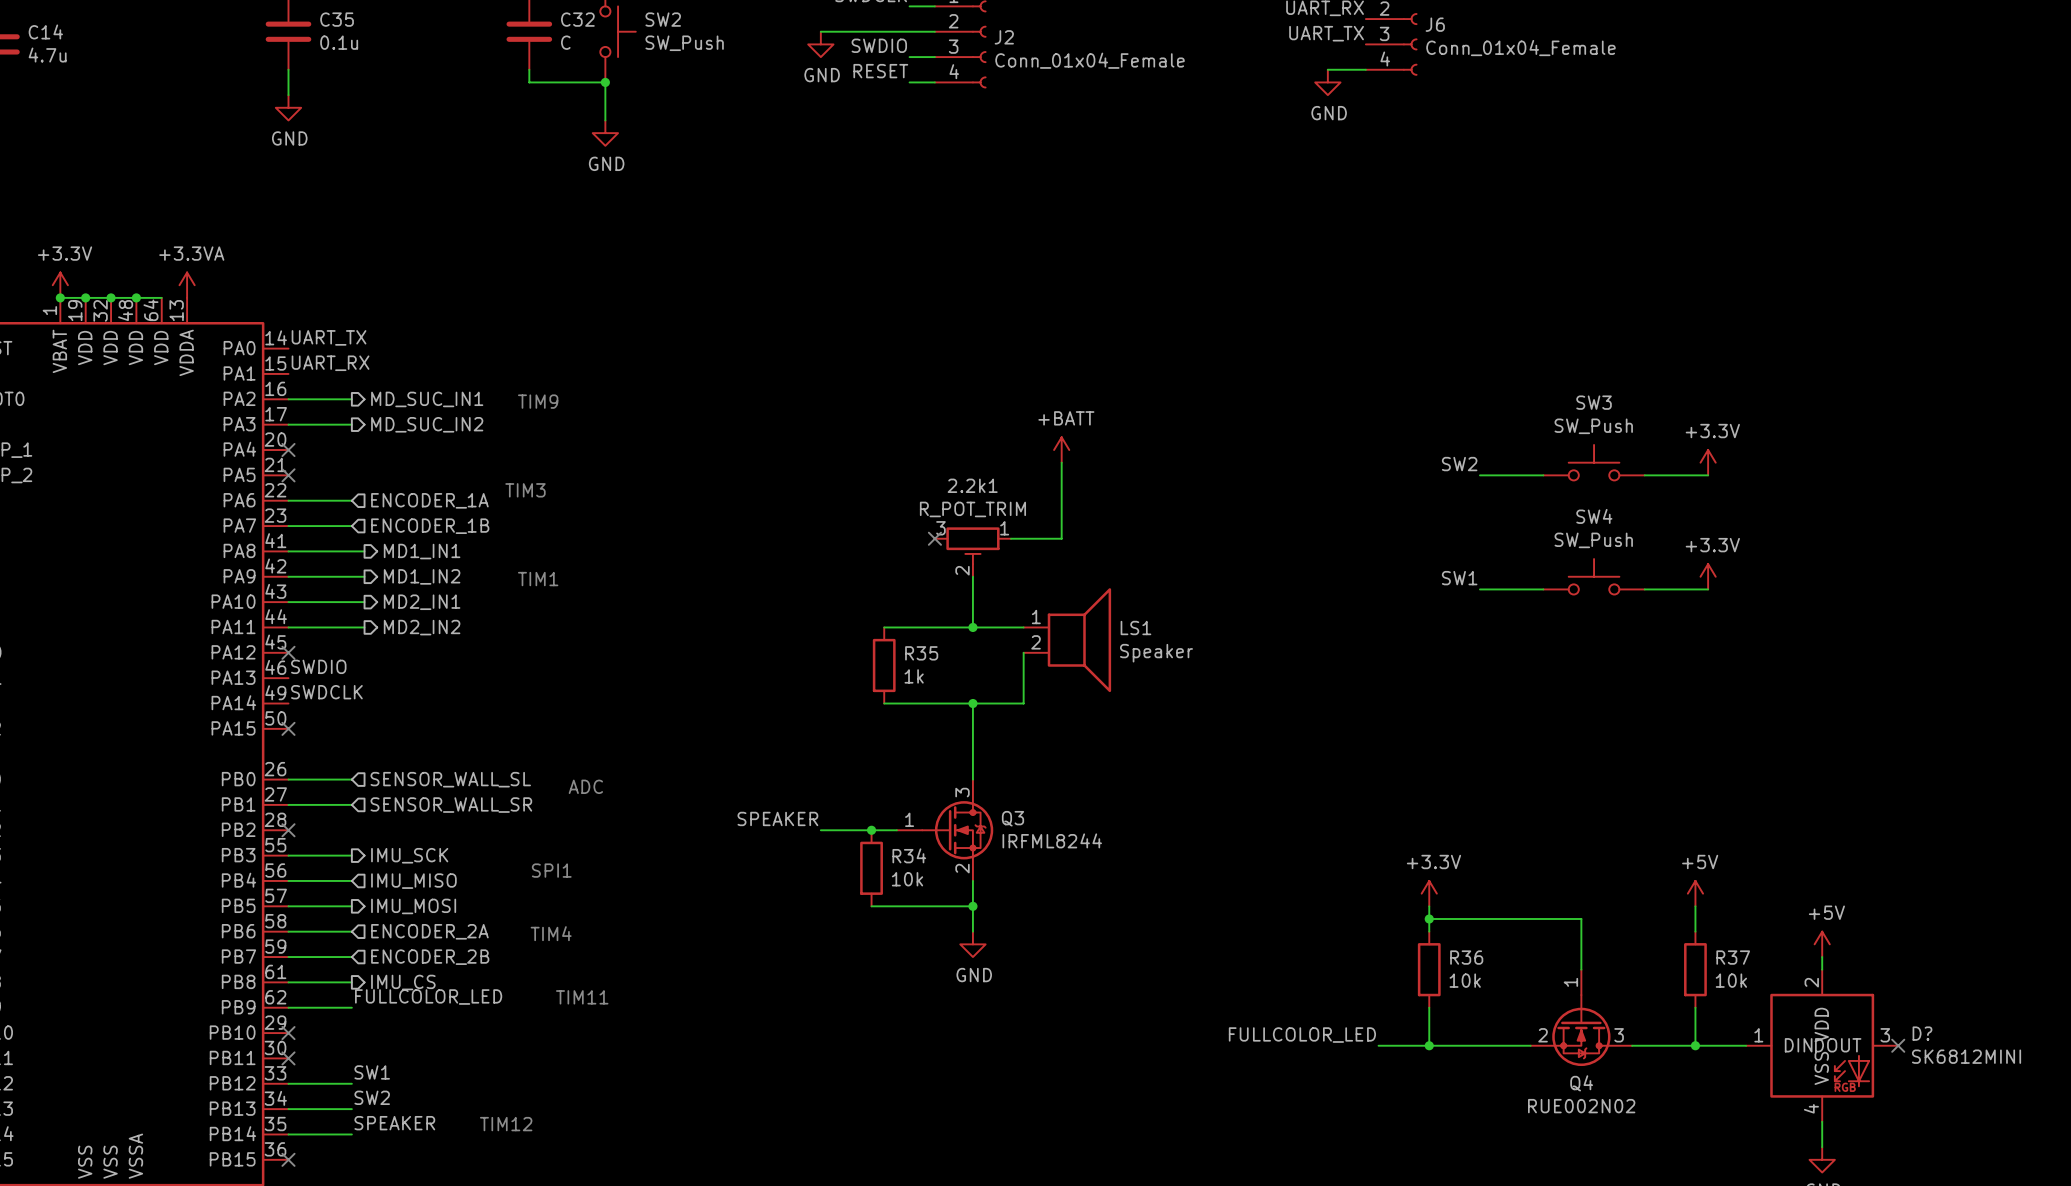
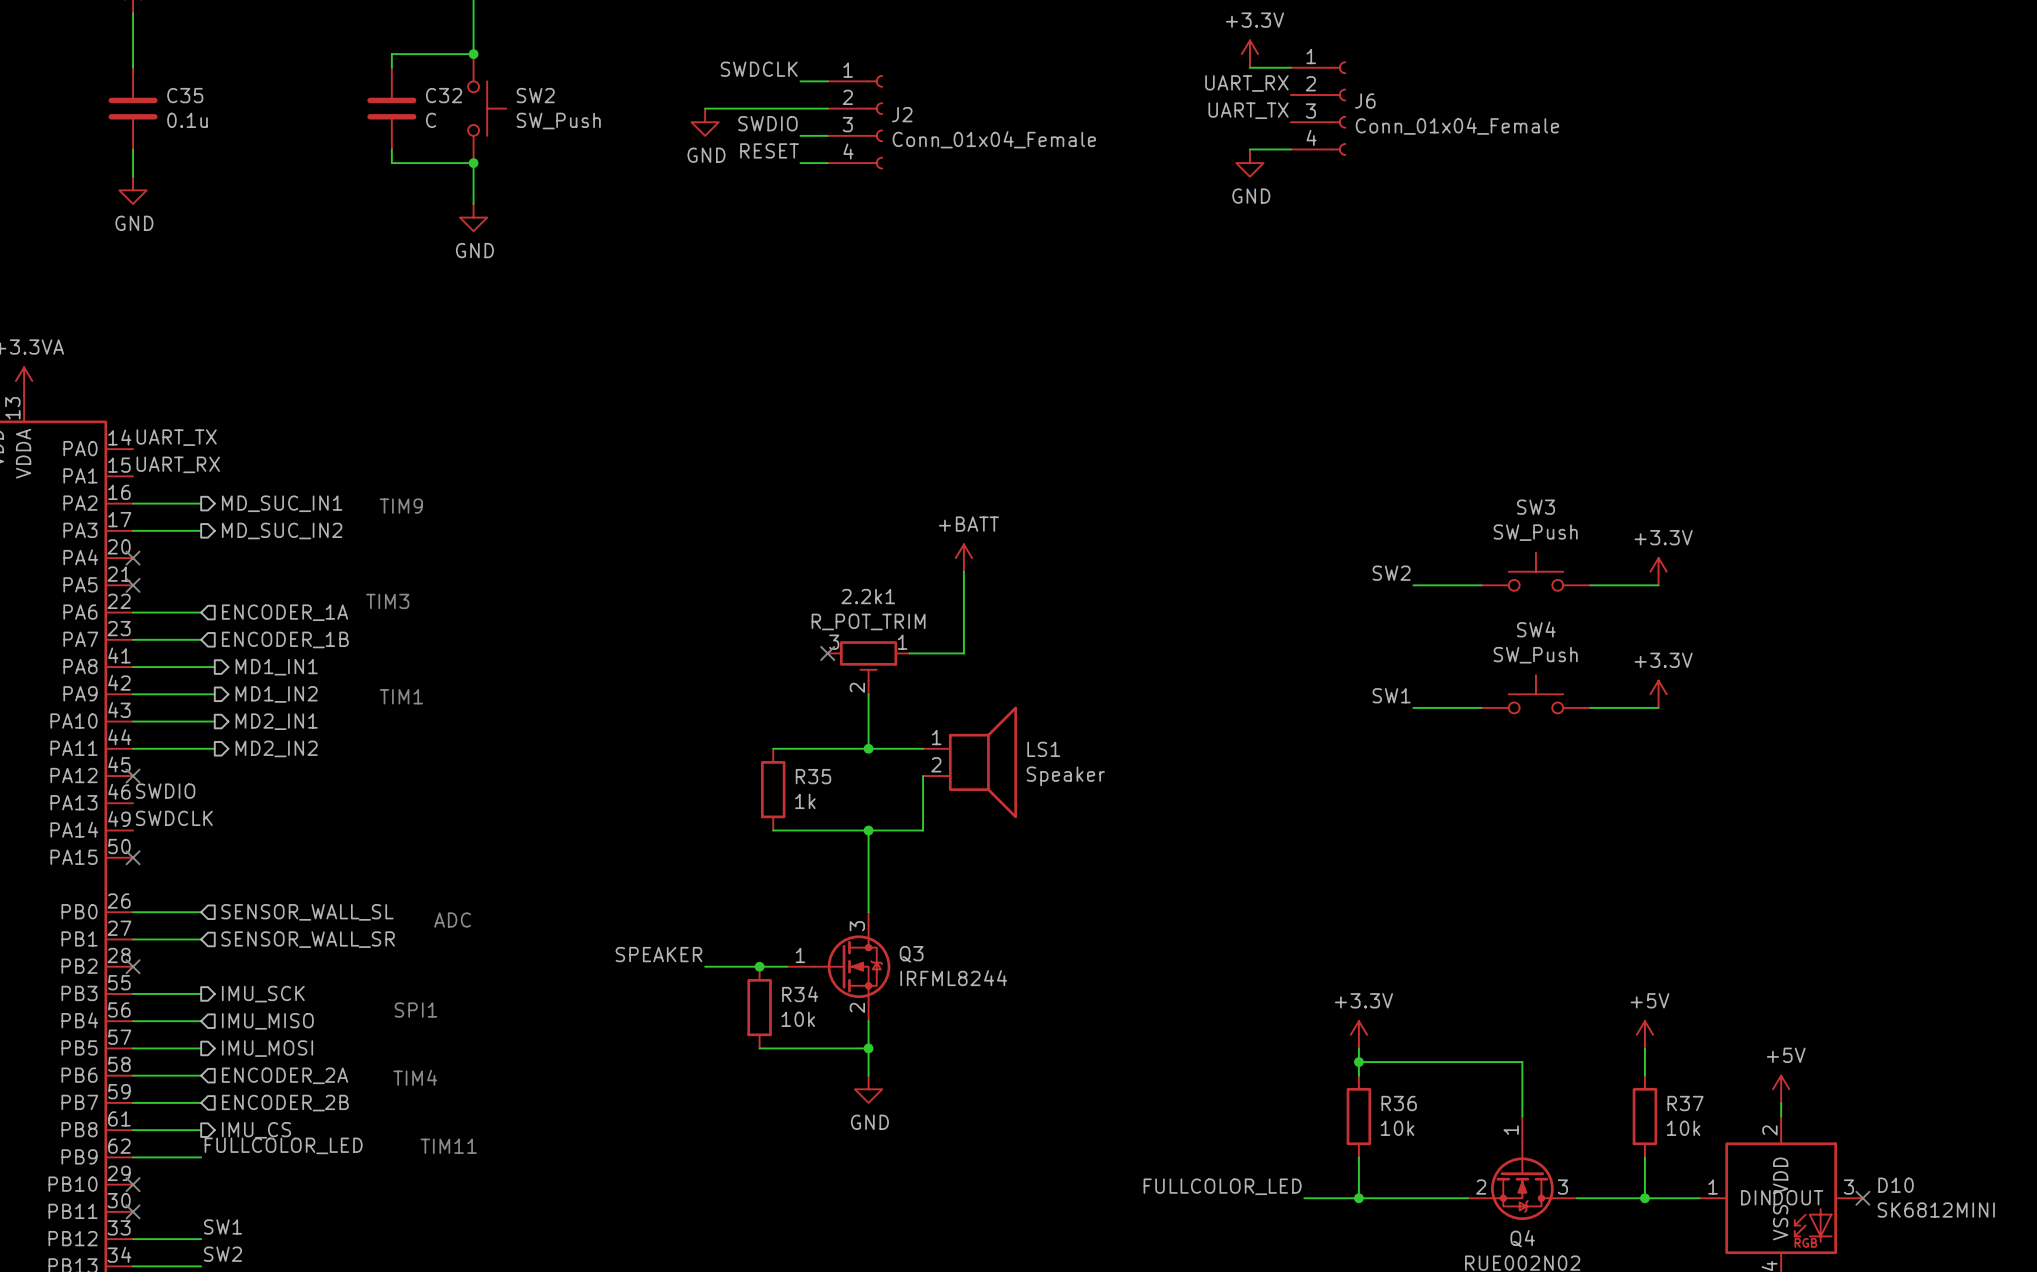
D? name: D? (1922, 1033) -> D10 (1896, 1185)

